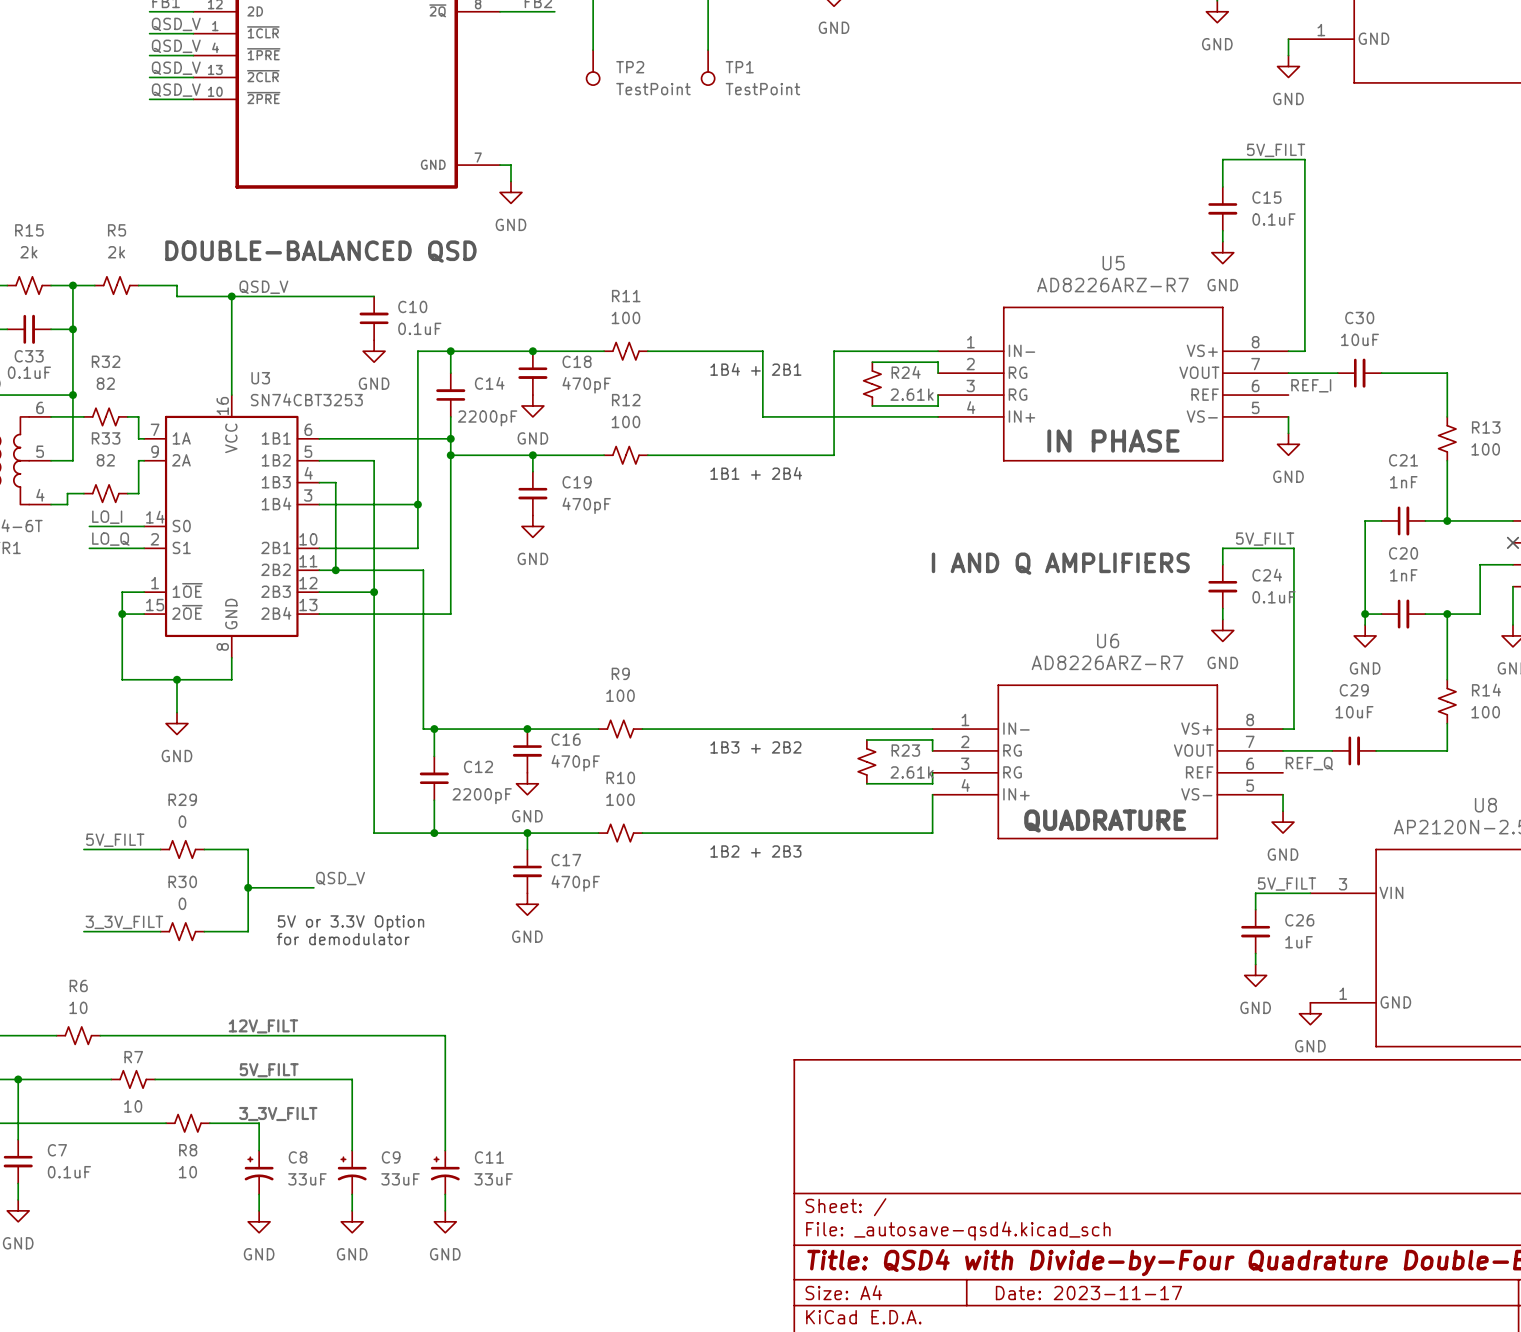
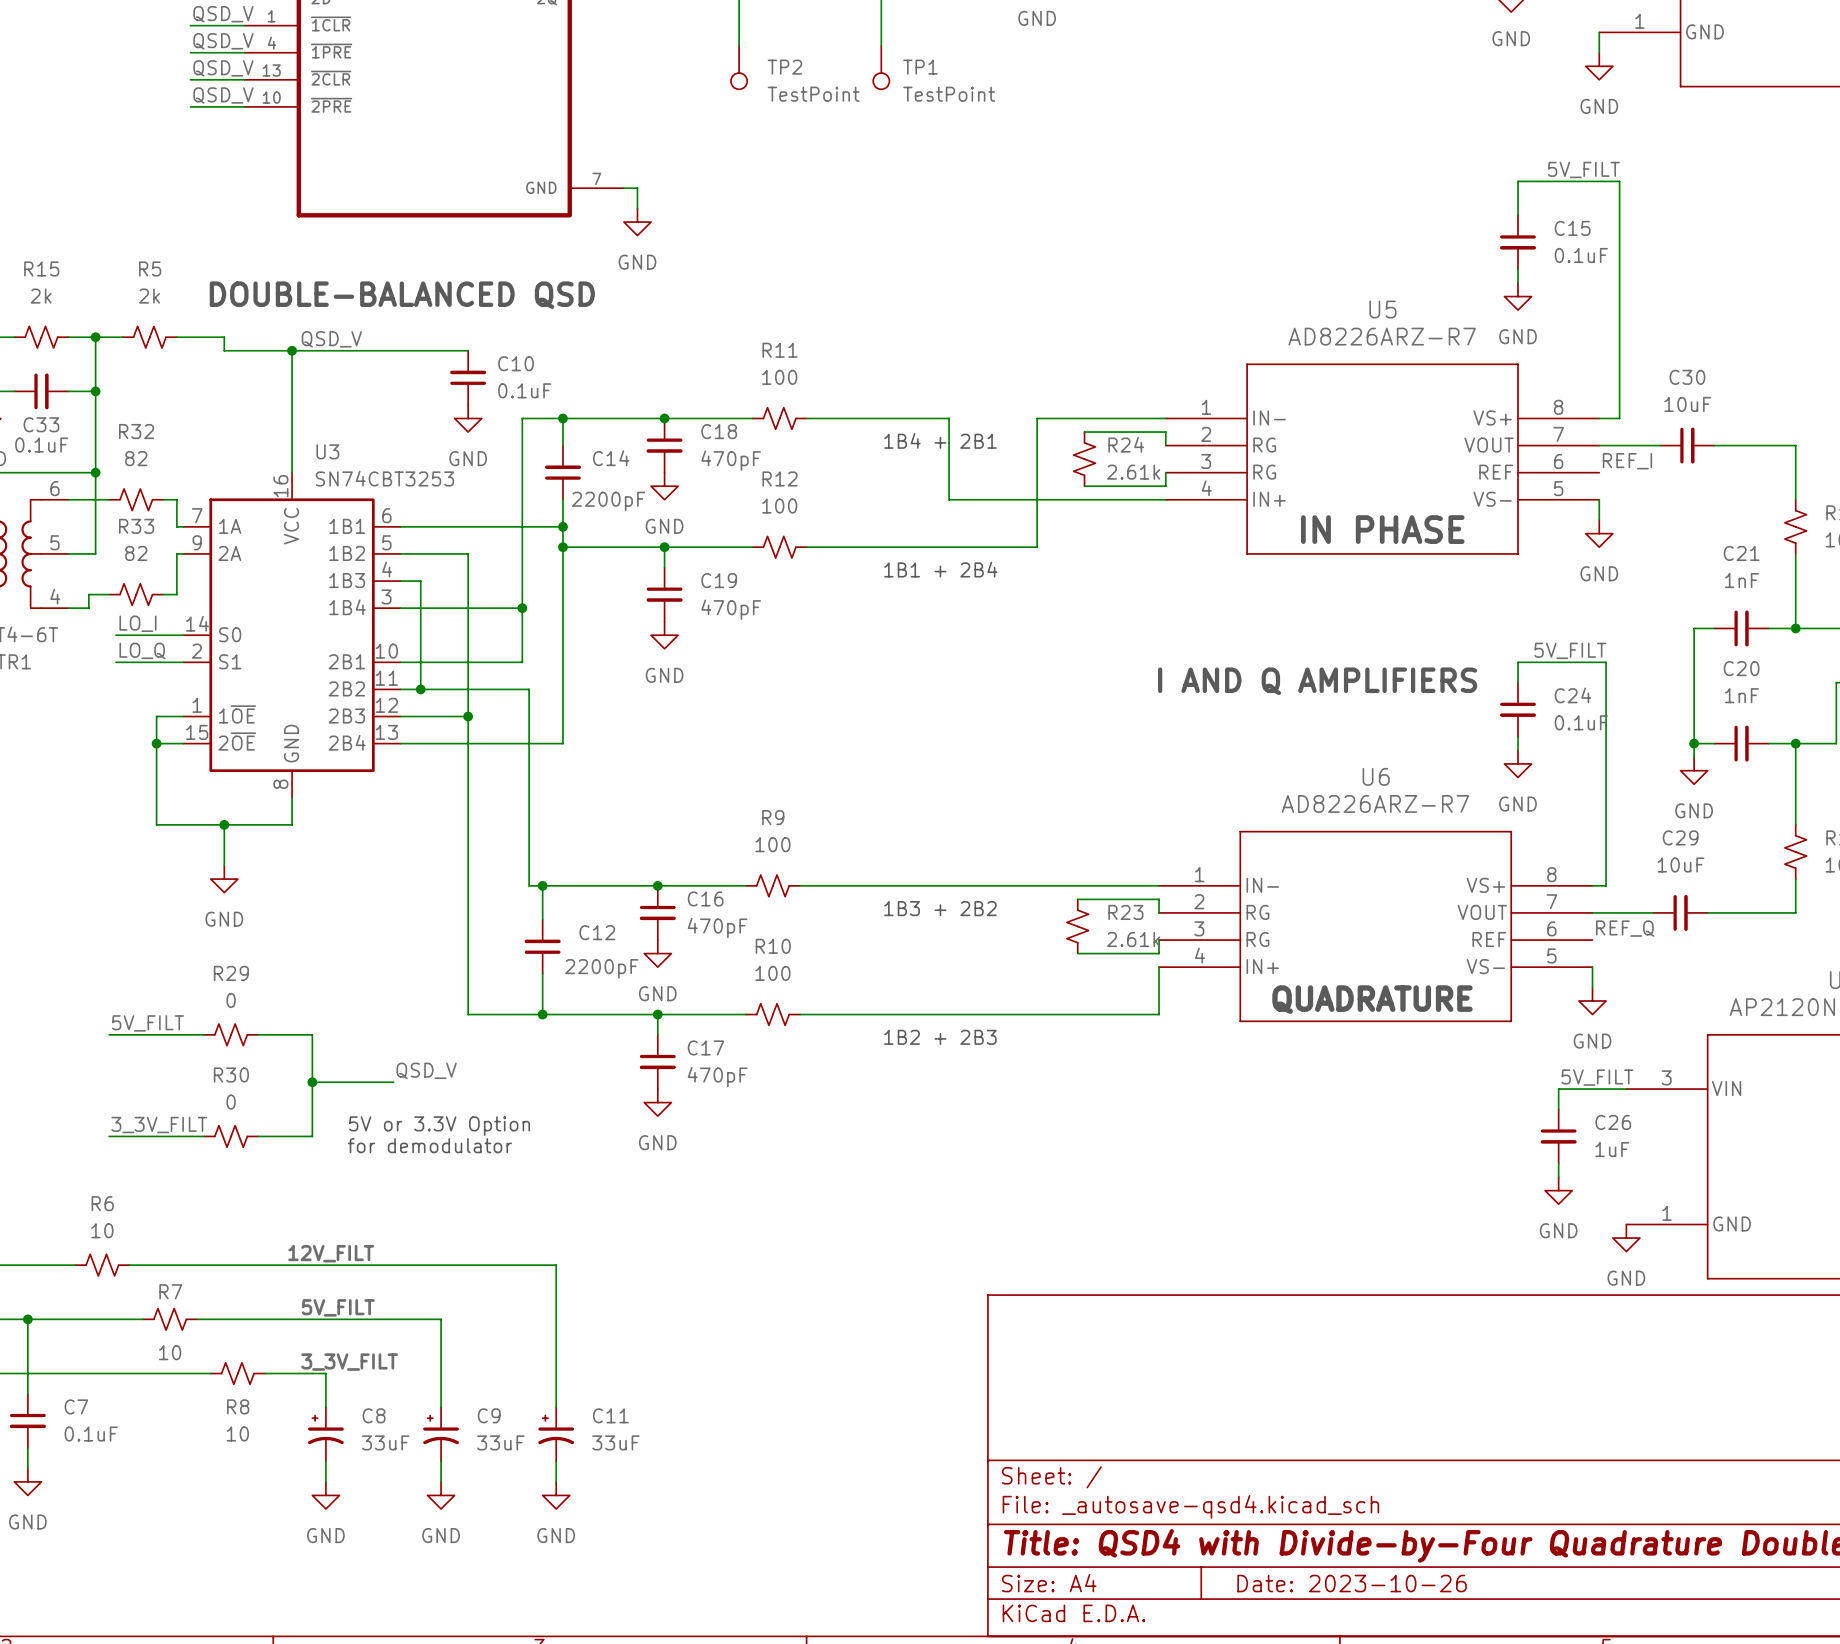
title block: Date: 2023-11-17 (1088, 1293) -> Date: 2023-10-26 (1352, 1583)

